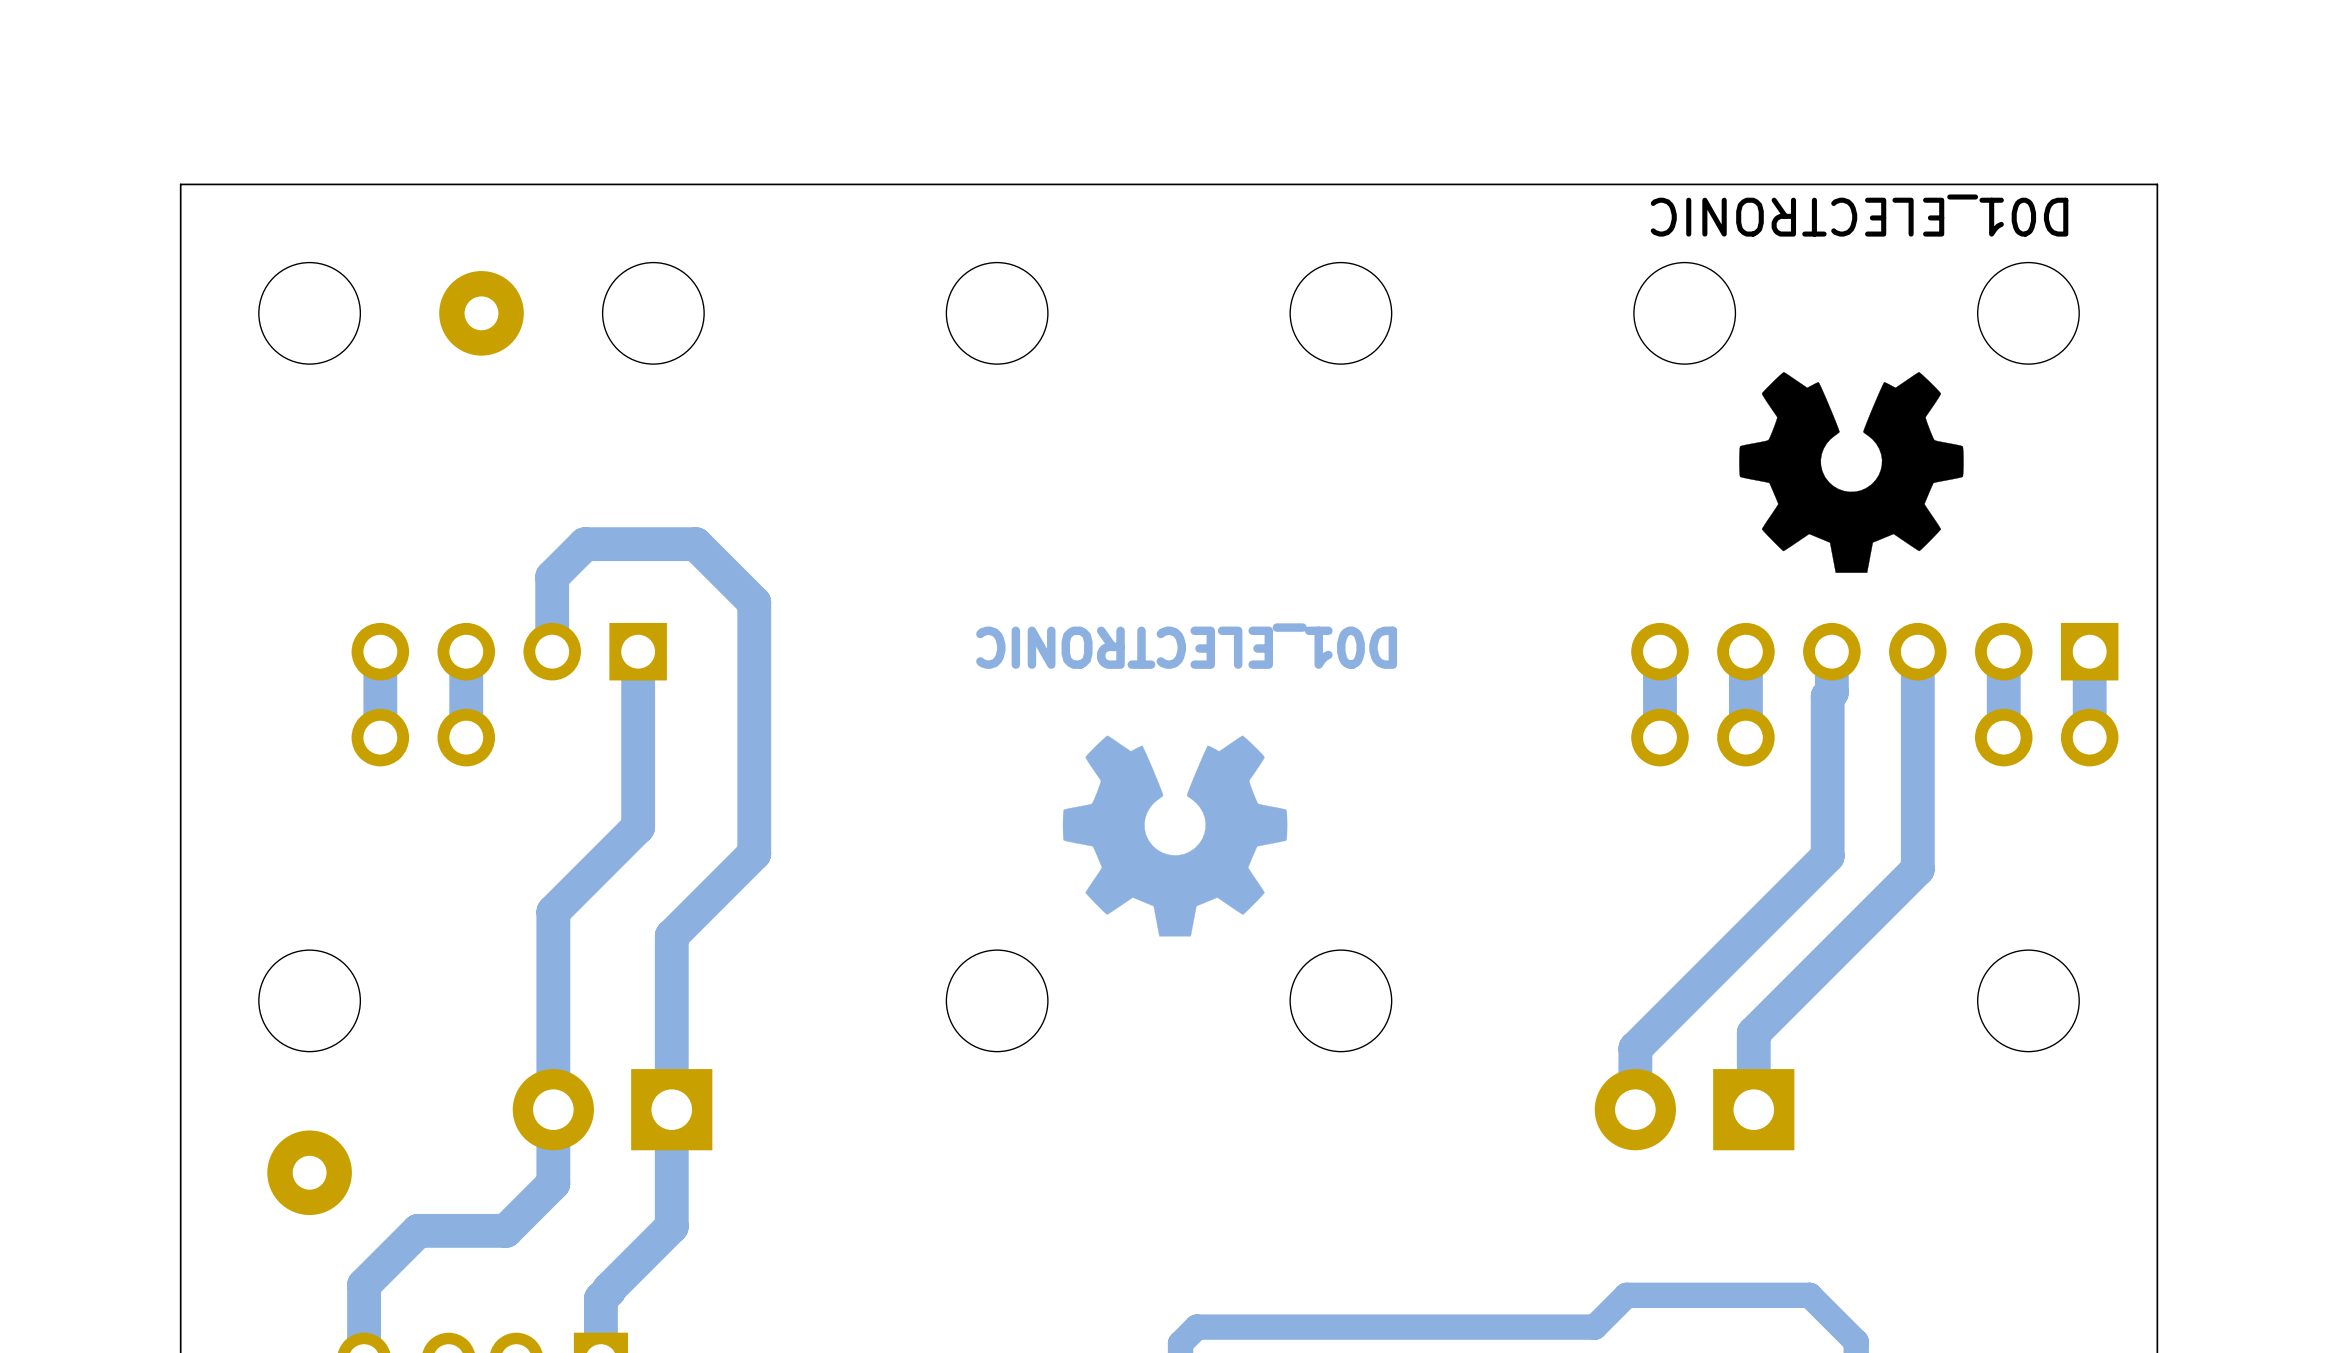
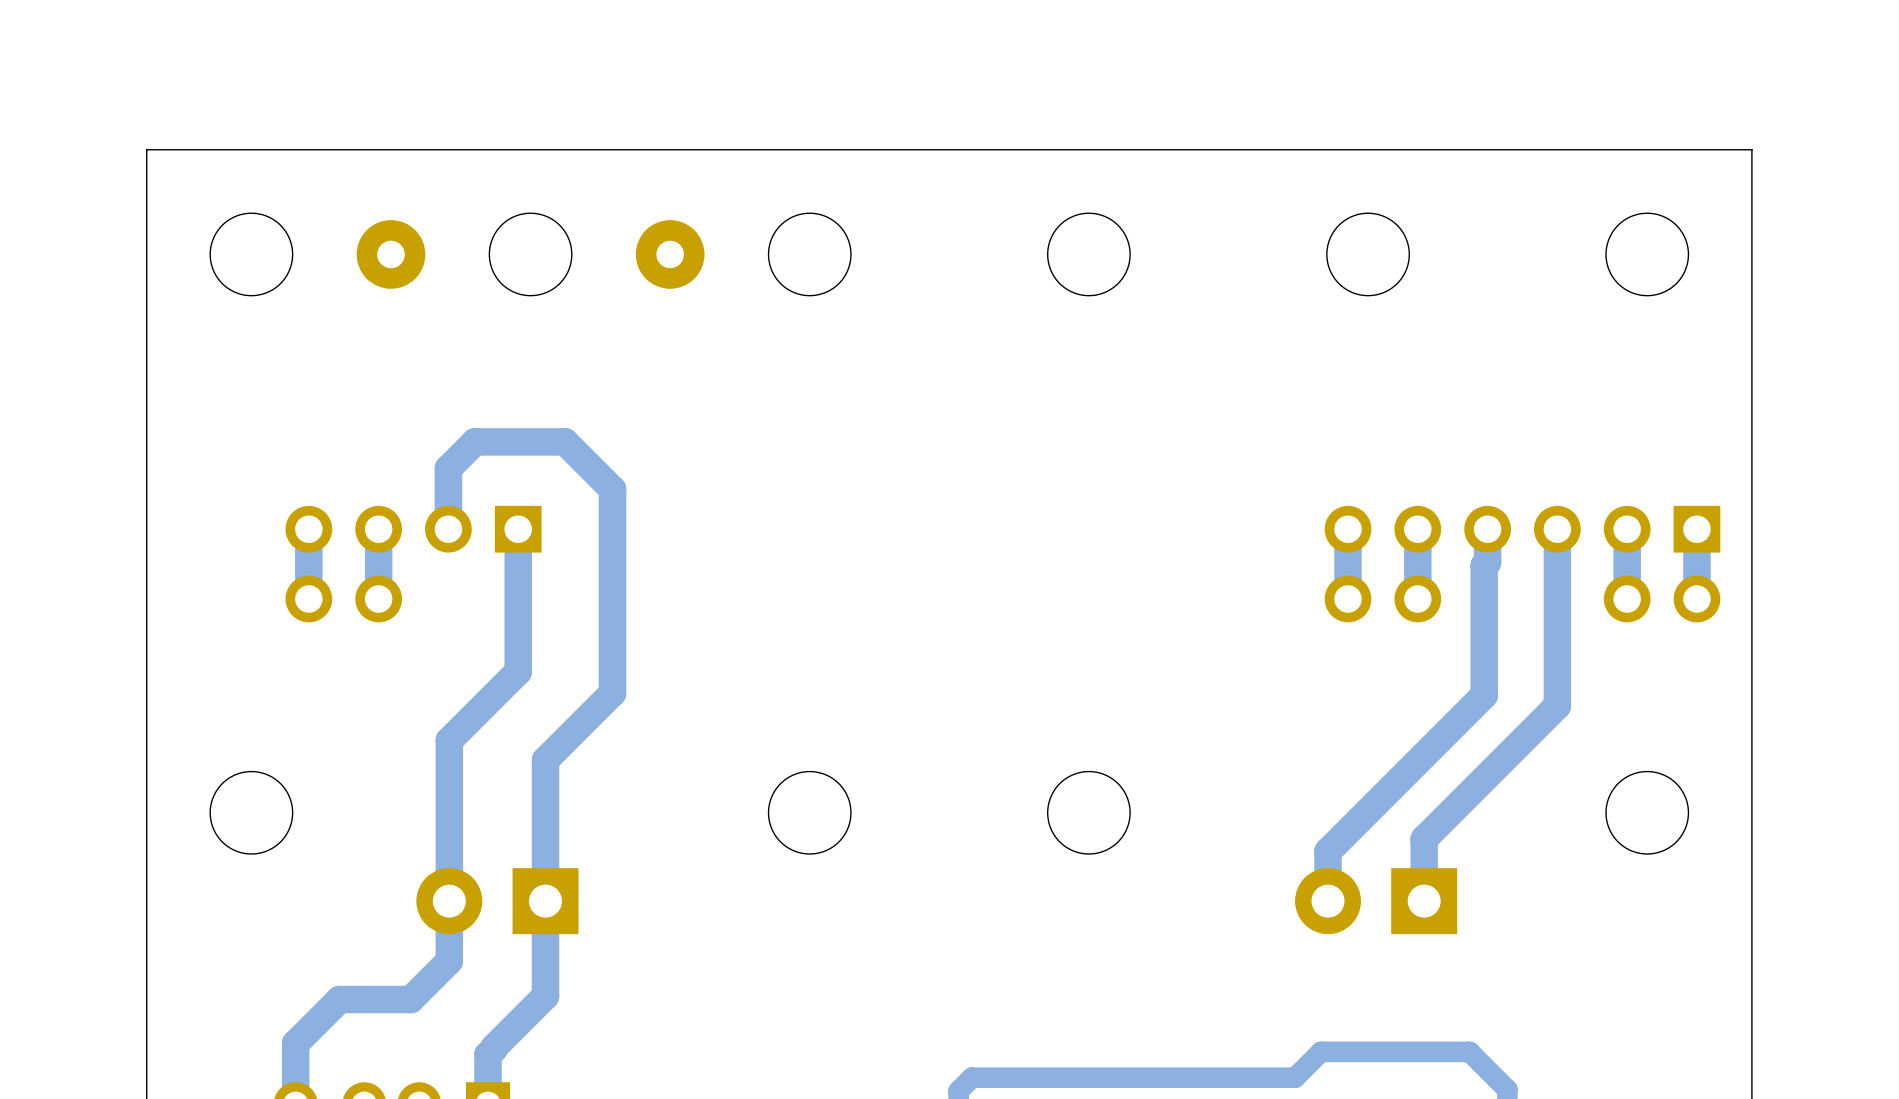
text: D01_ELECTRONIC (1859, 215) -> none
part: none -> (670, 254)
drawing: [1739, 372, 1964, 573] -> none
text: D01_ELECTRONIC (1186, 646) -> none
drawing: [1062, 735, 1288, 937] -> none
part: (309, 1172) -> none

